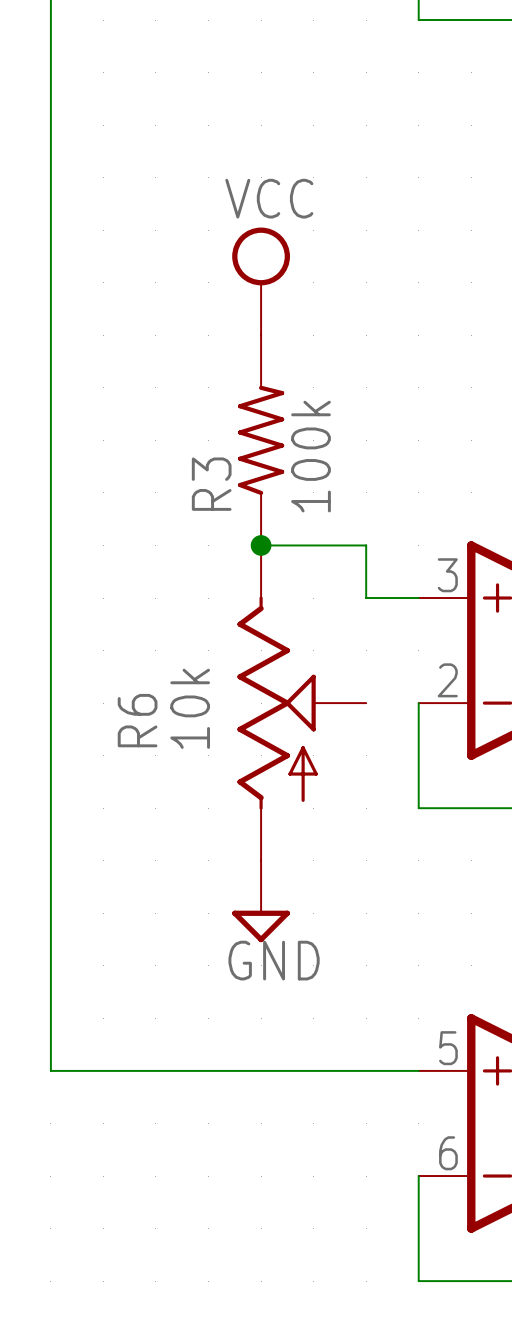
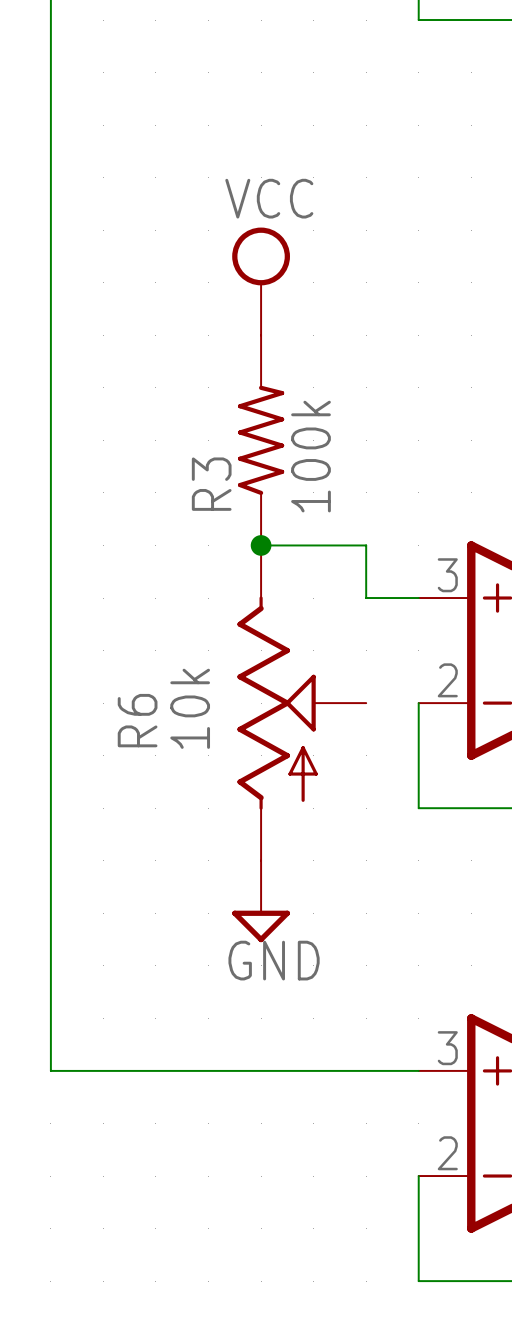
part pin number: 5 (448, 1048) -> 3 (447, 1048)
part pin number: 6 (448, 1153) -> 2 (447, 1153)

